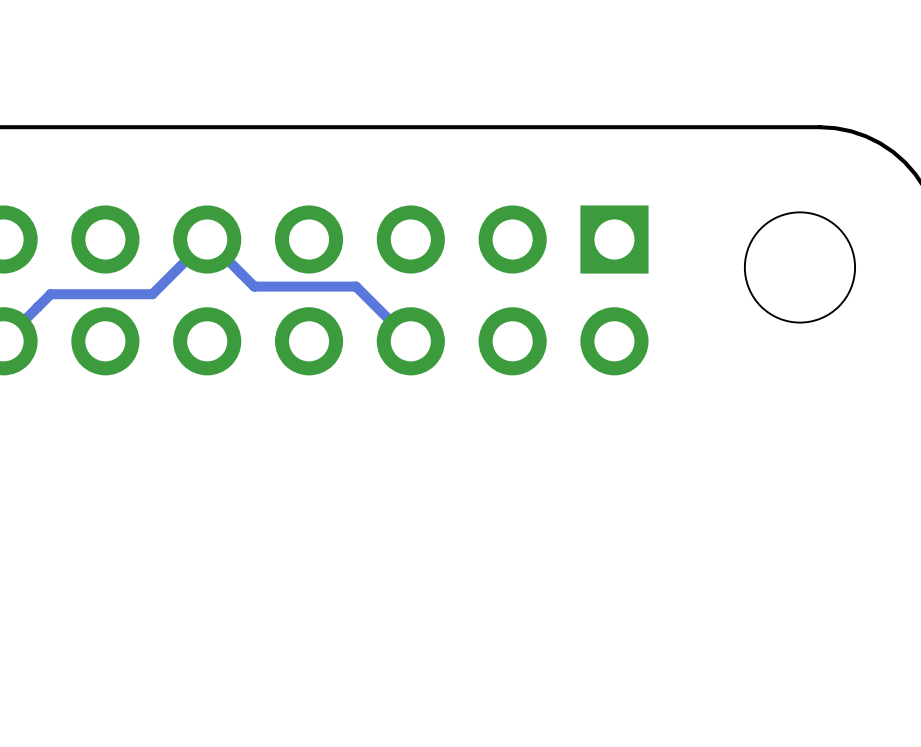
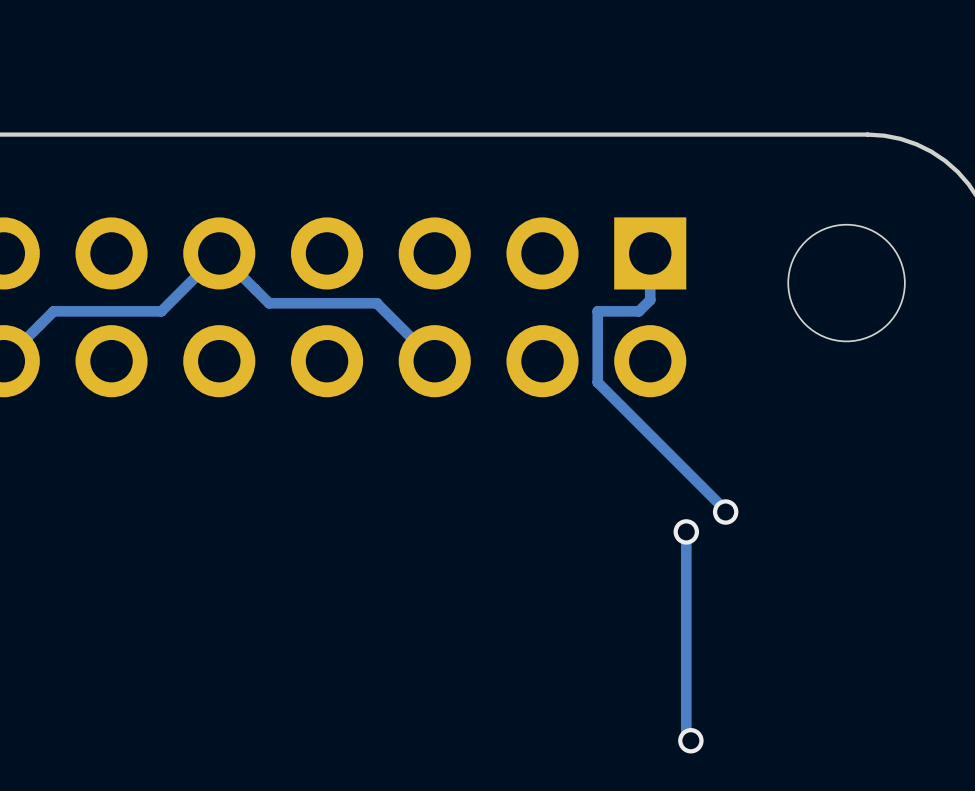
track: none -> (650, 253) (650, 300) (639, 311) (597, 311) (597, 382) (725, 512)
via: none -> (725, 512)
track: none -> (686, 531) (686, 736) (690, 740)
via: none -> (686, 531)
via: none -> (690, 740)

